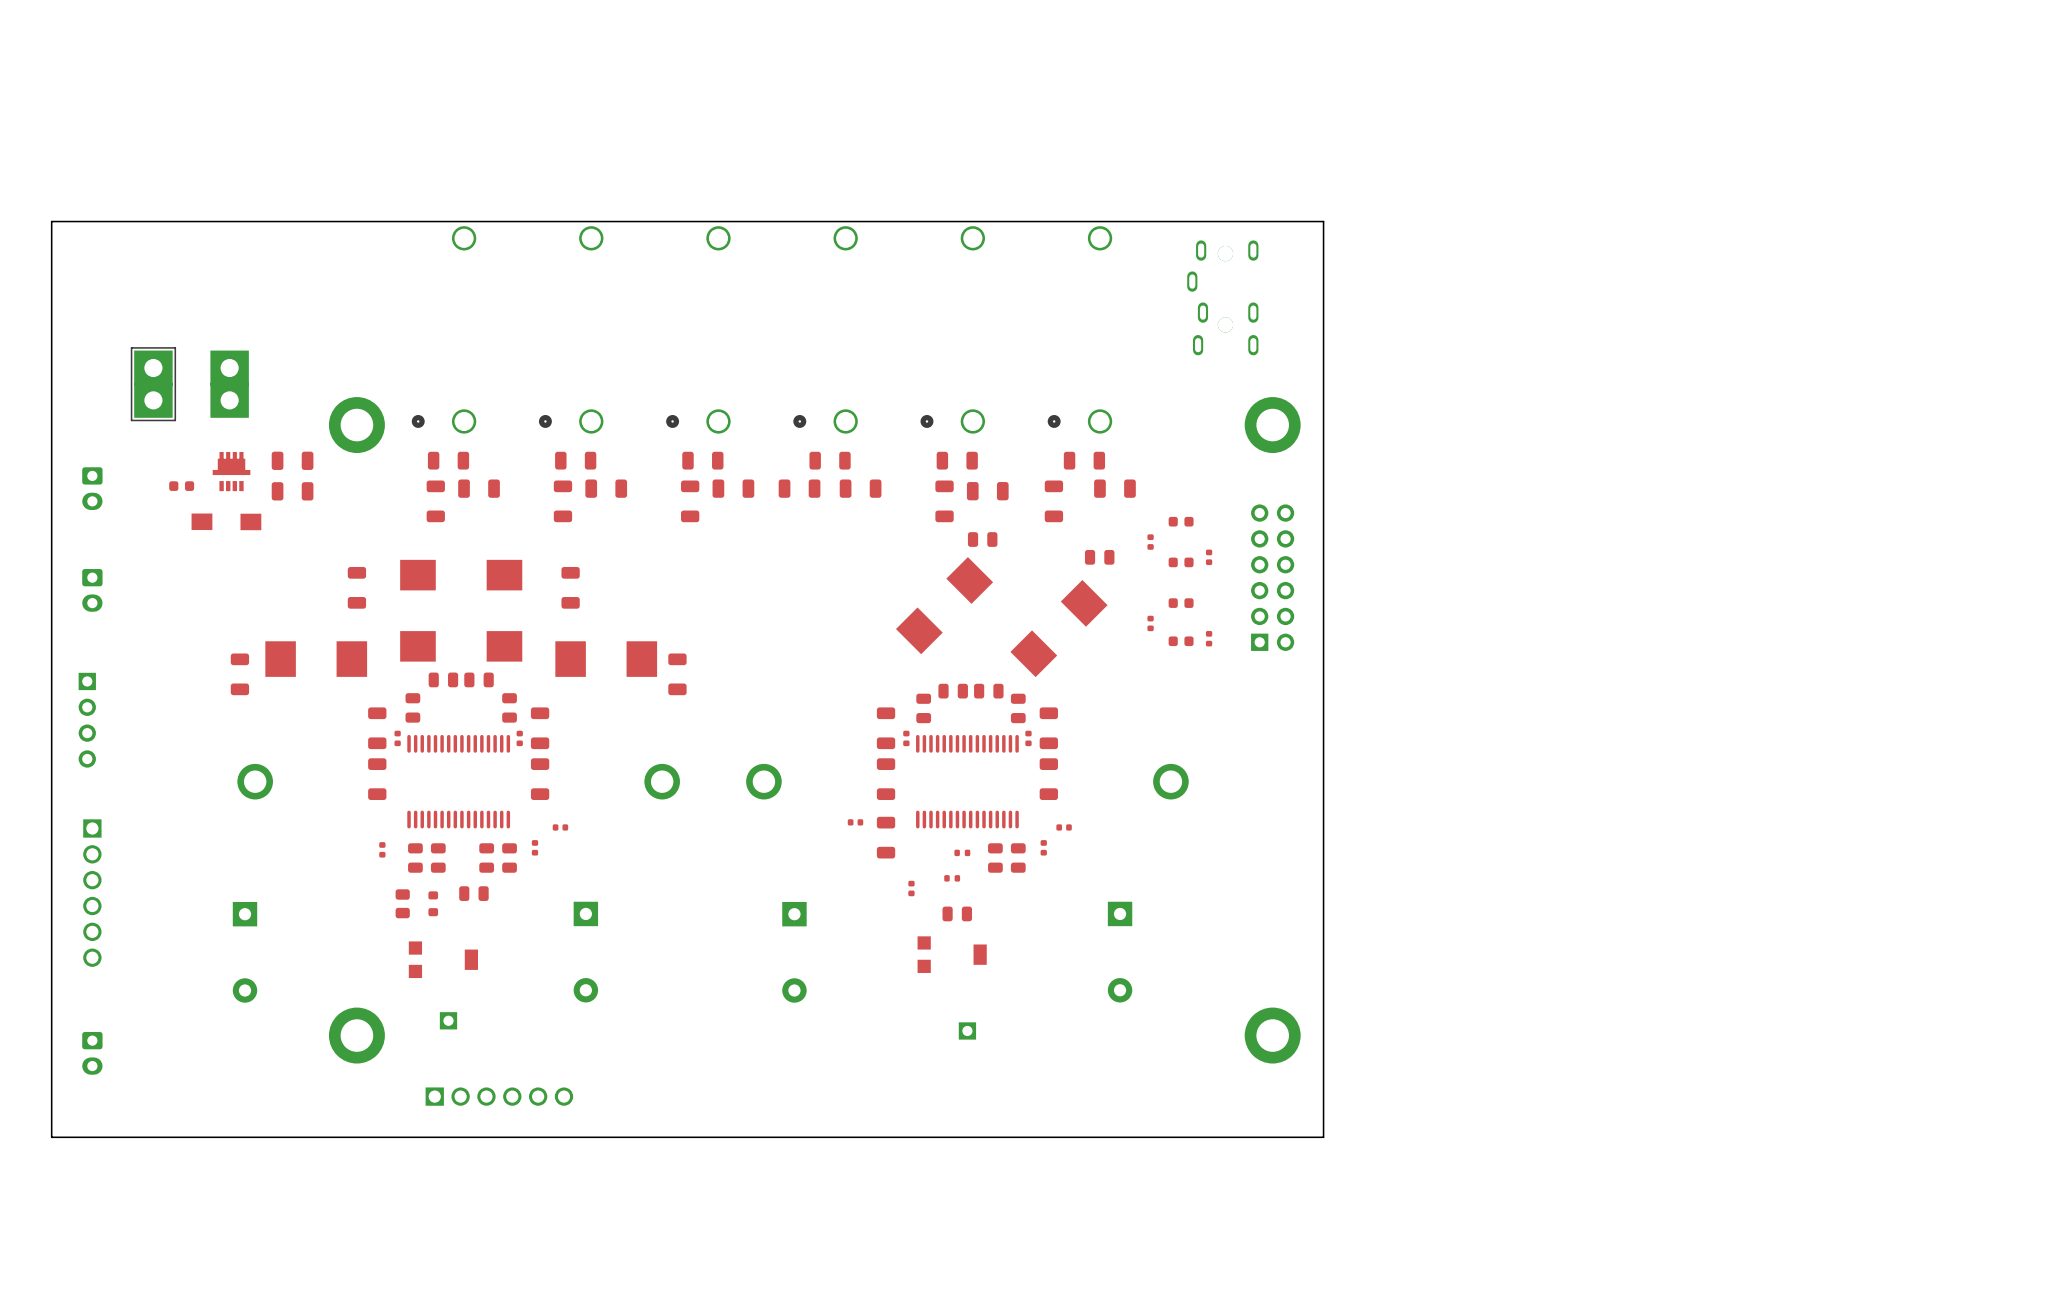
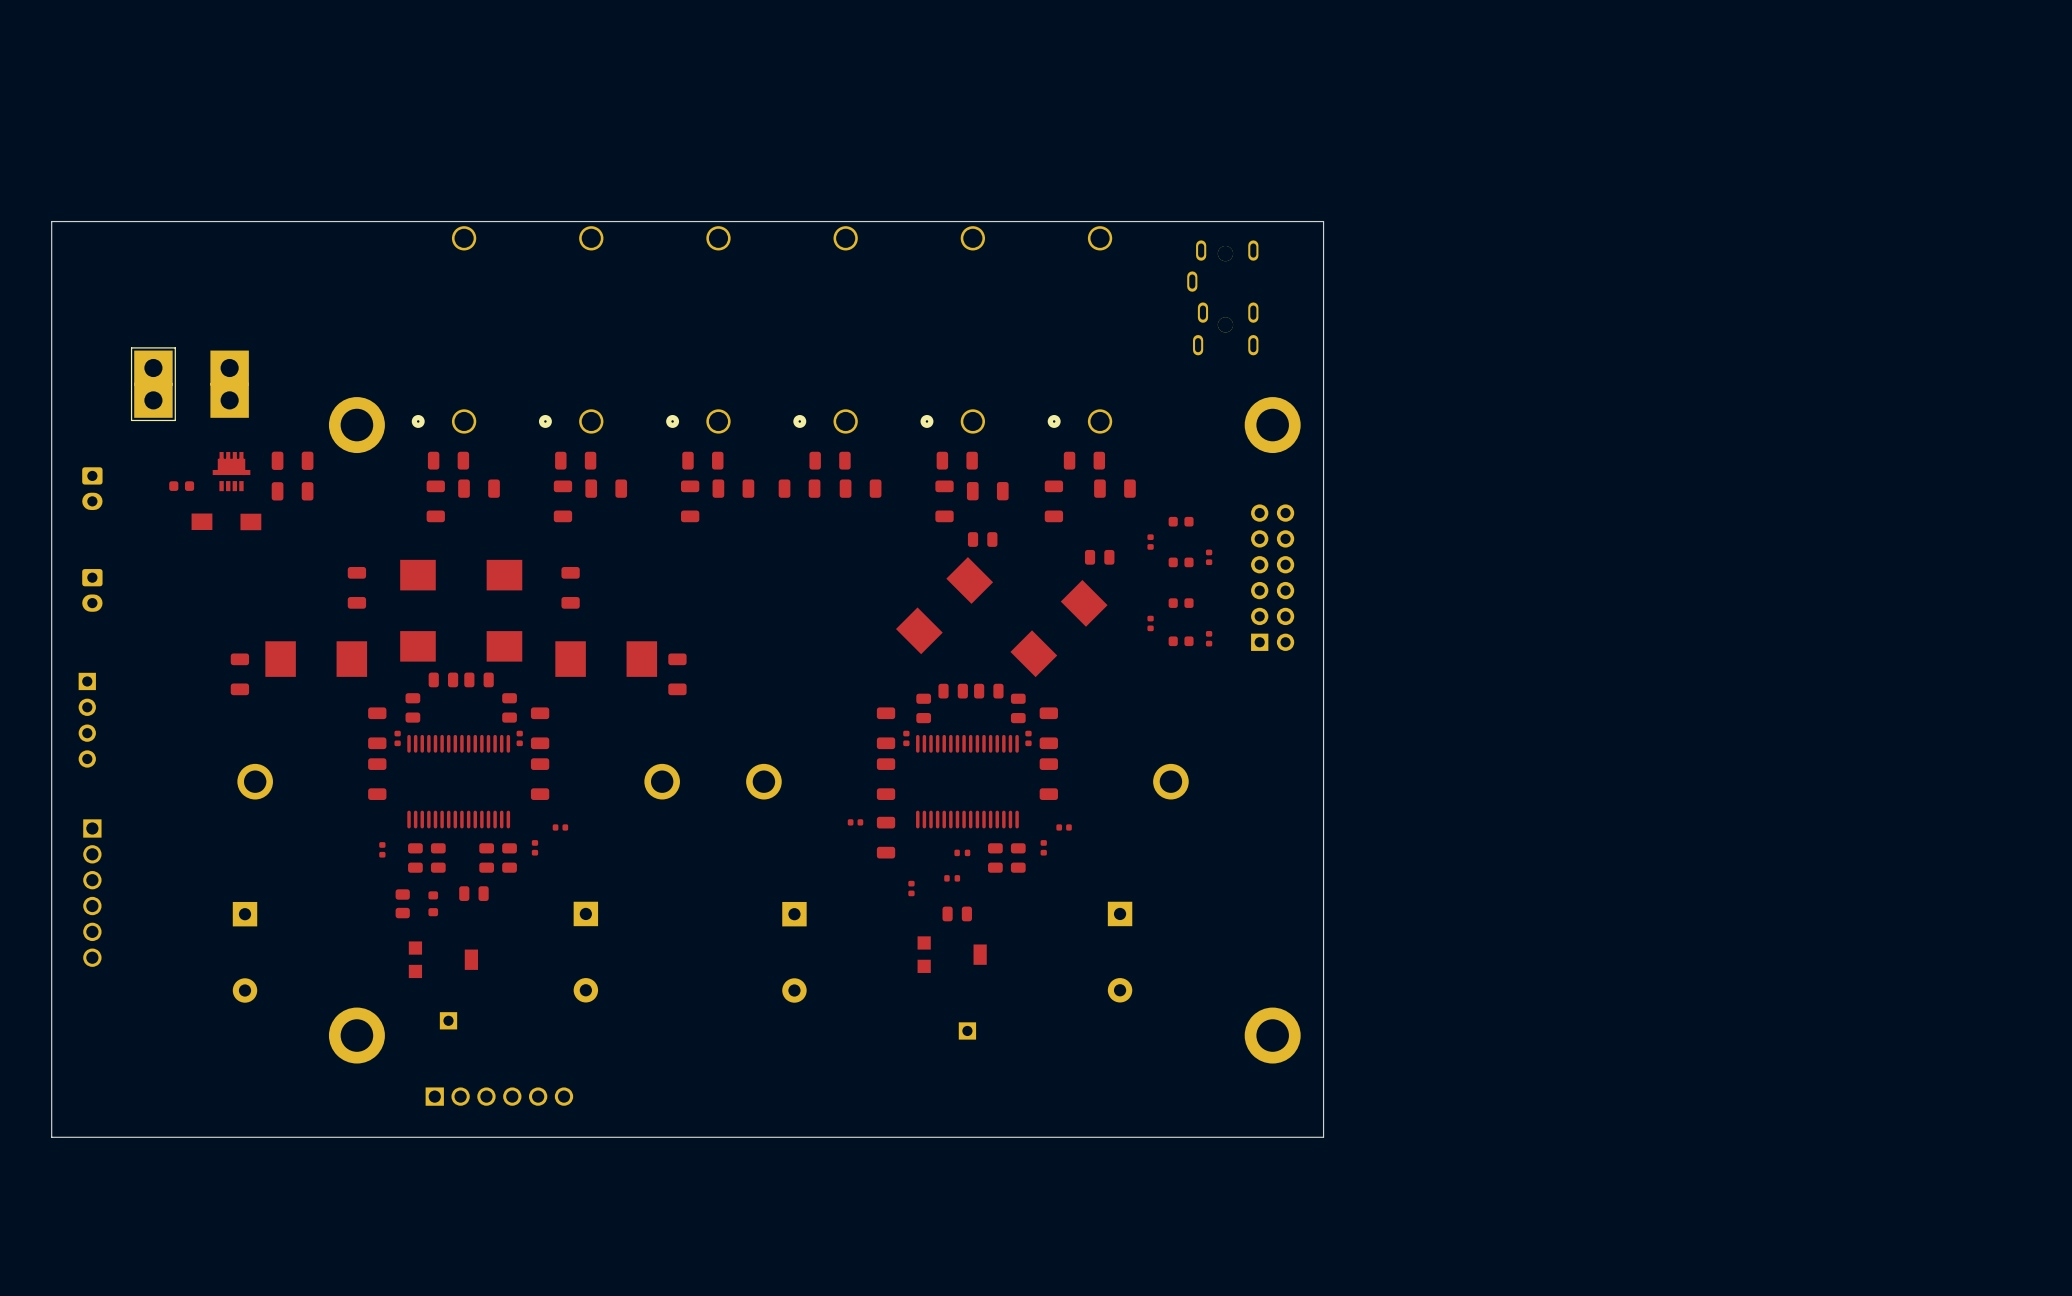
part: (92, 1053) -> none

